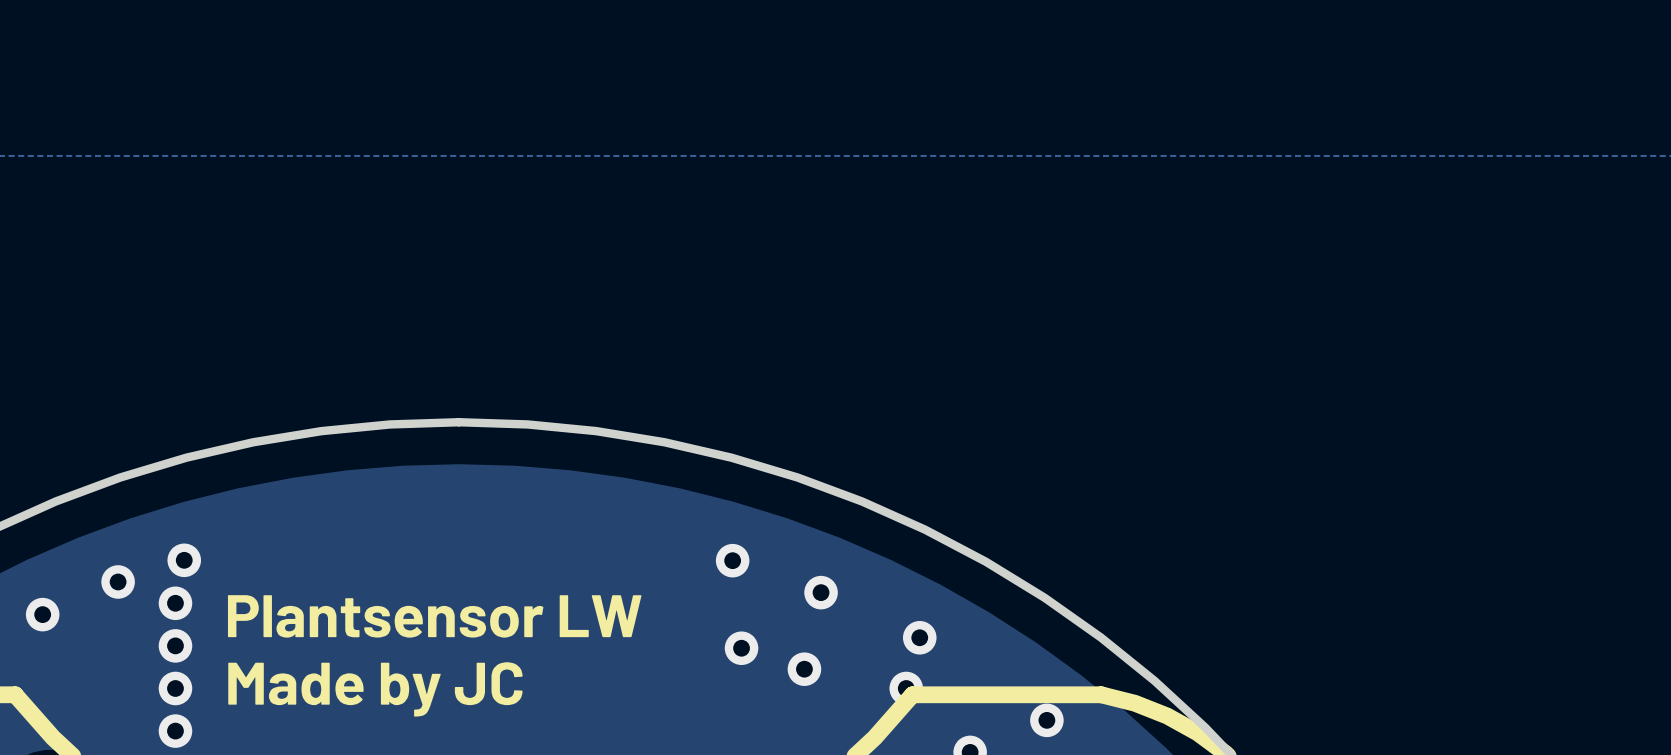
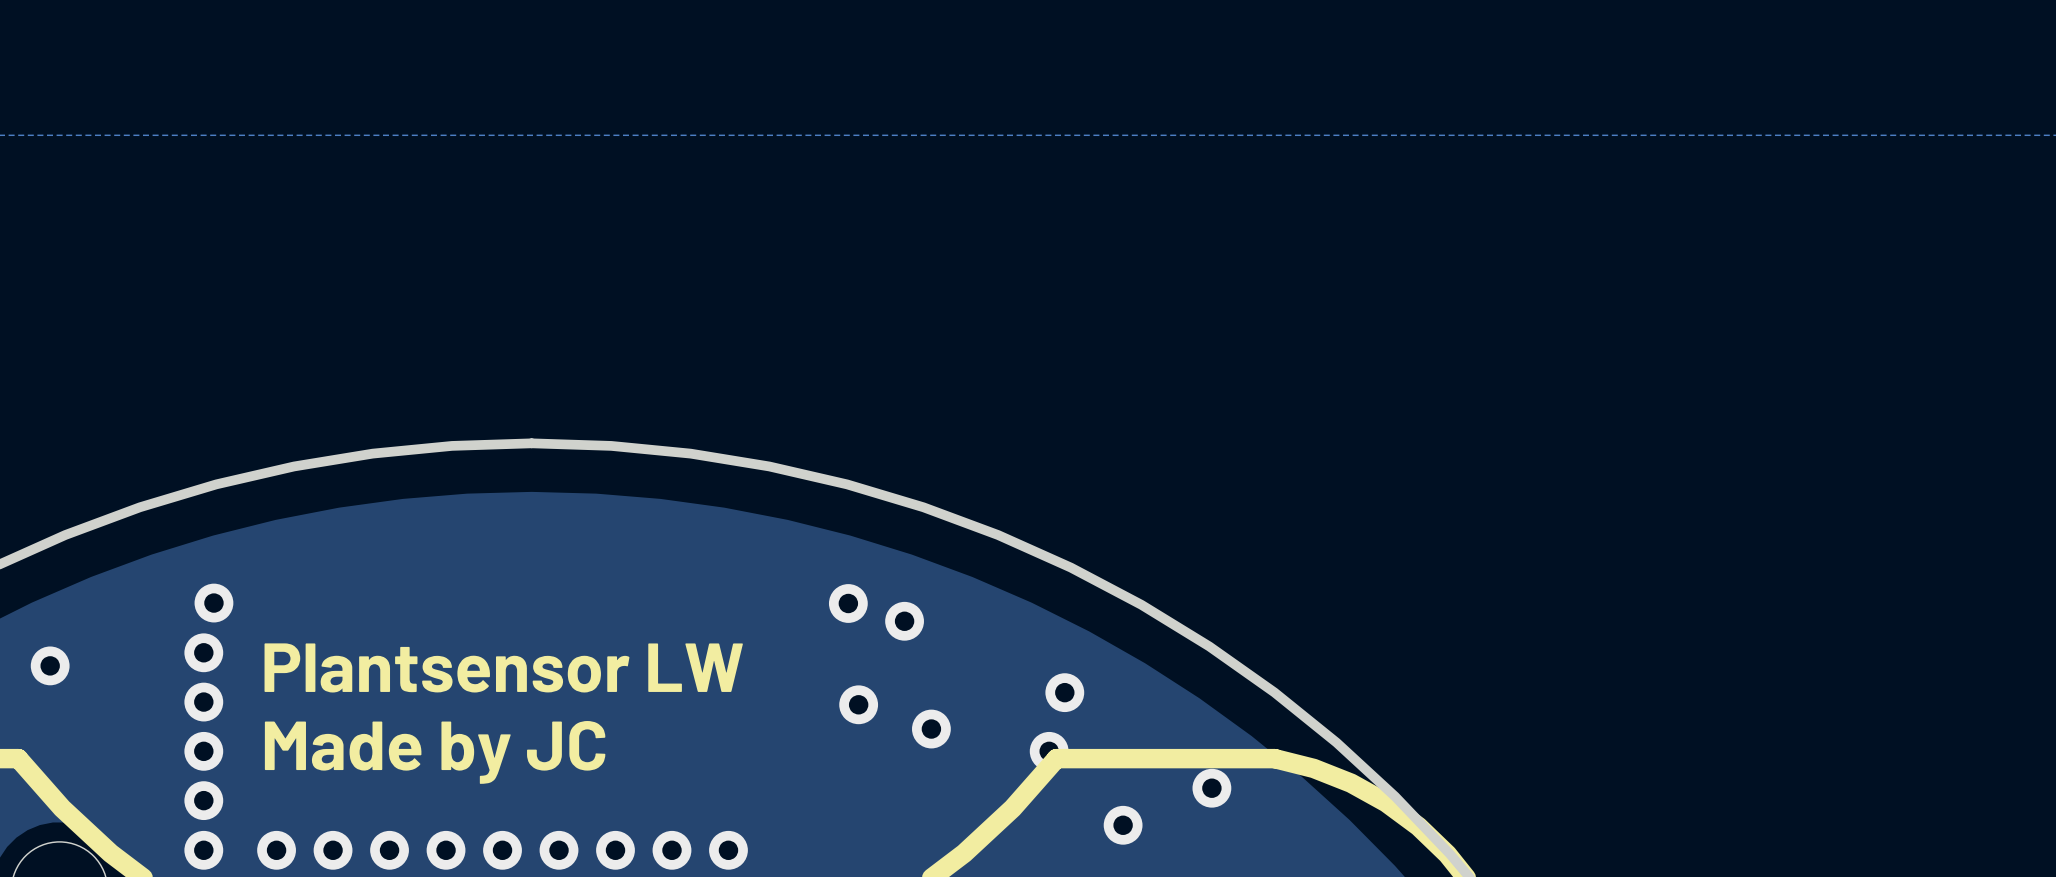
via: (118, 581) -> none
via position: (821, 592) -> (904, 621)

